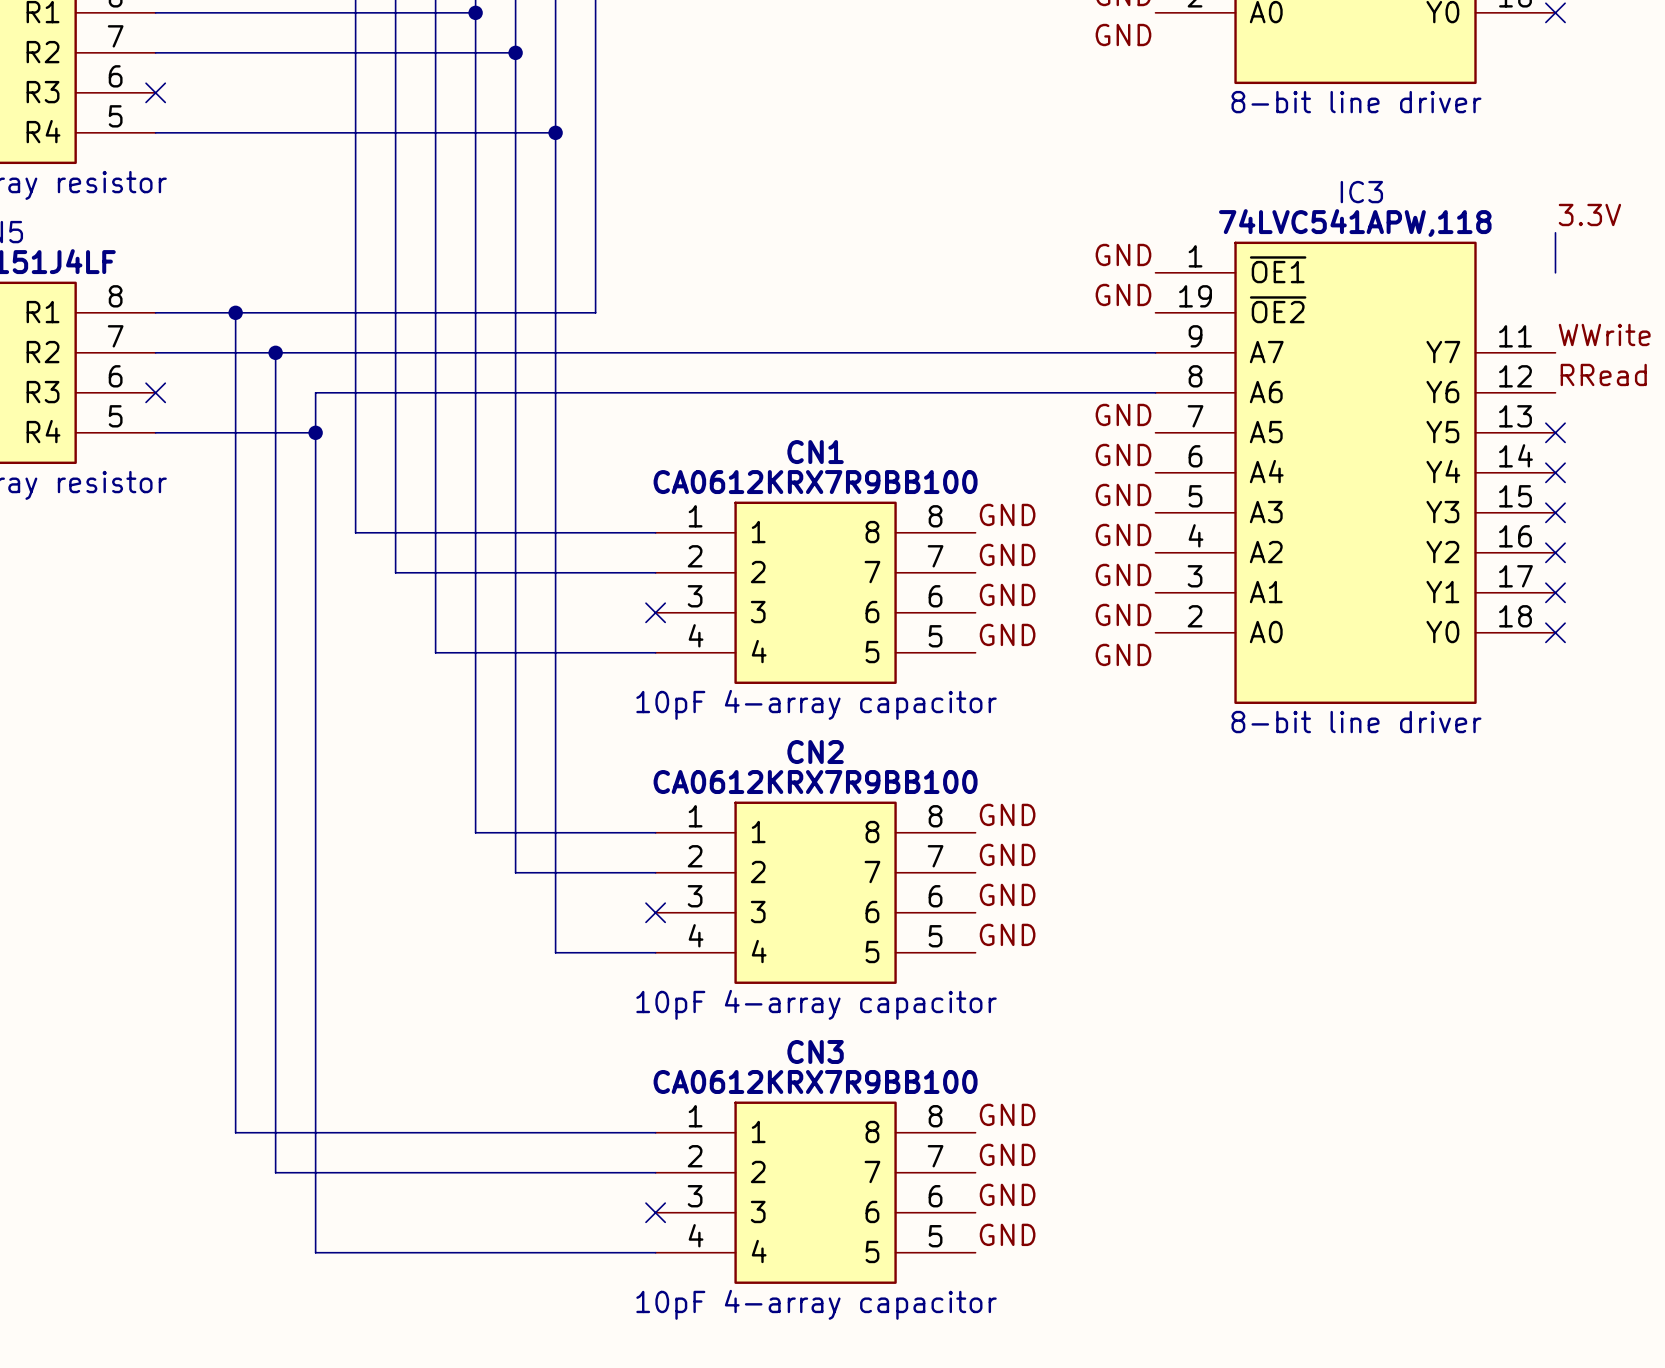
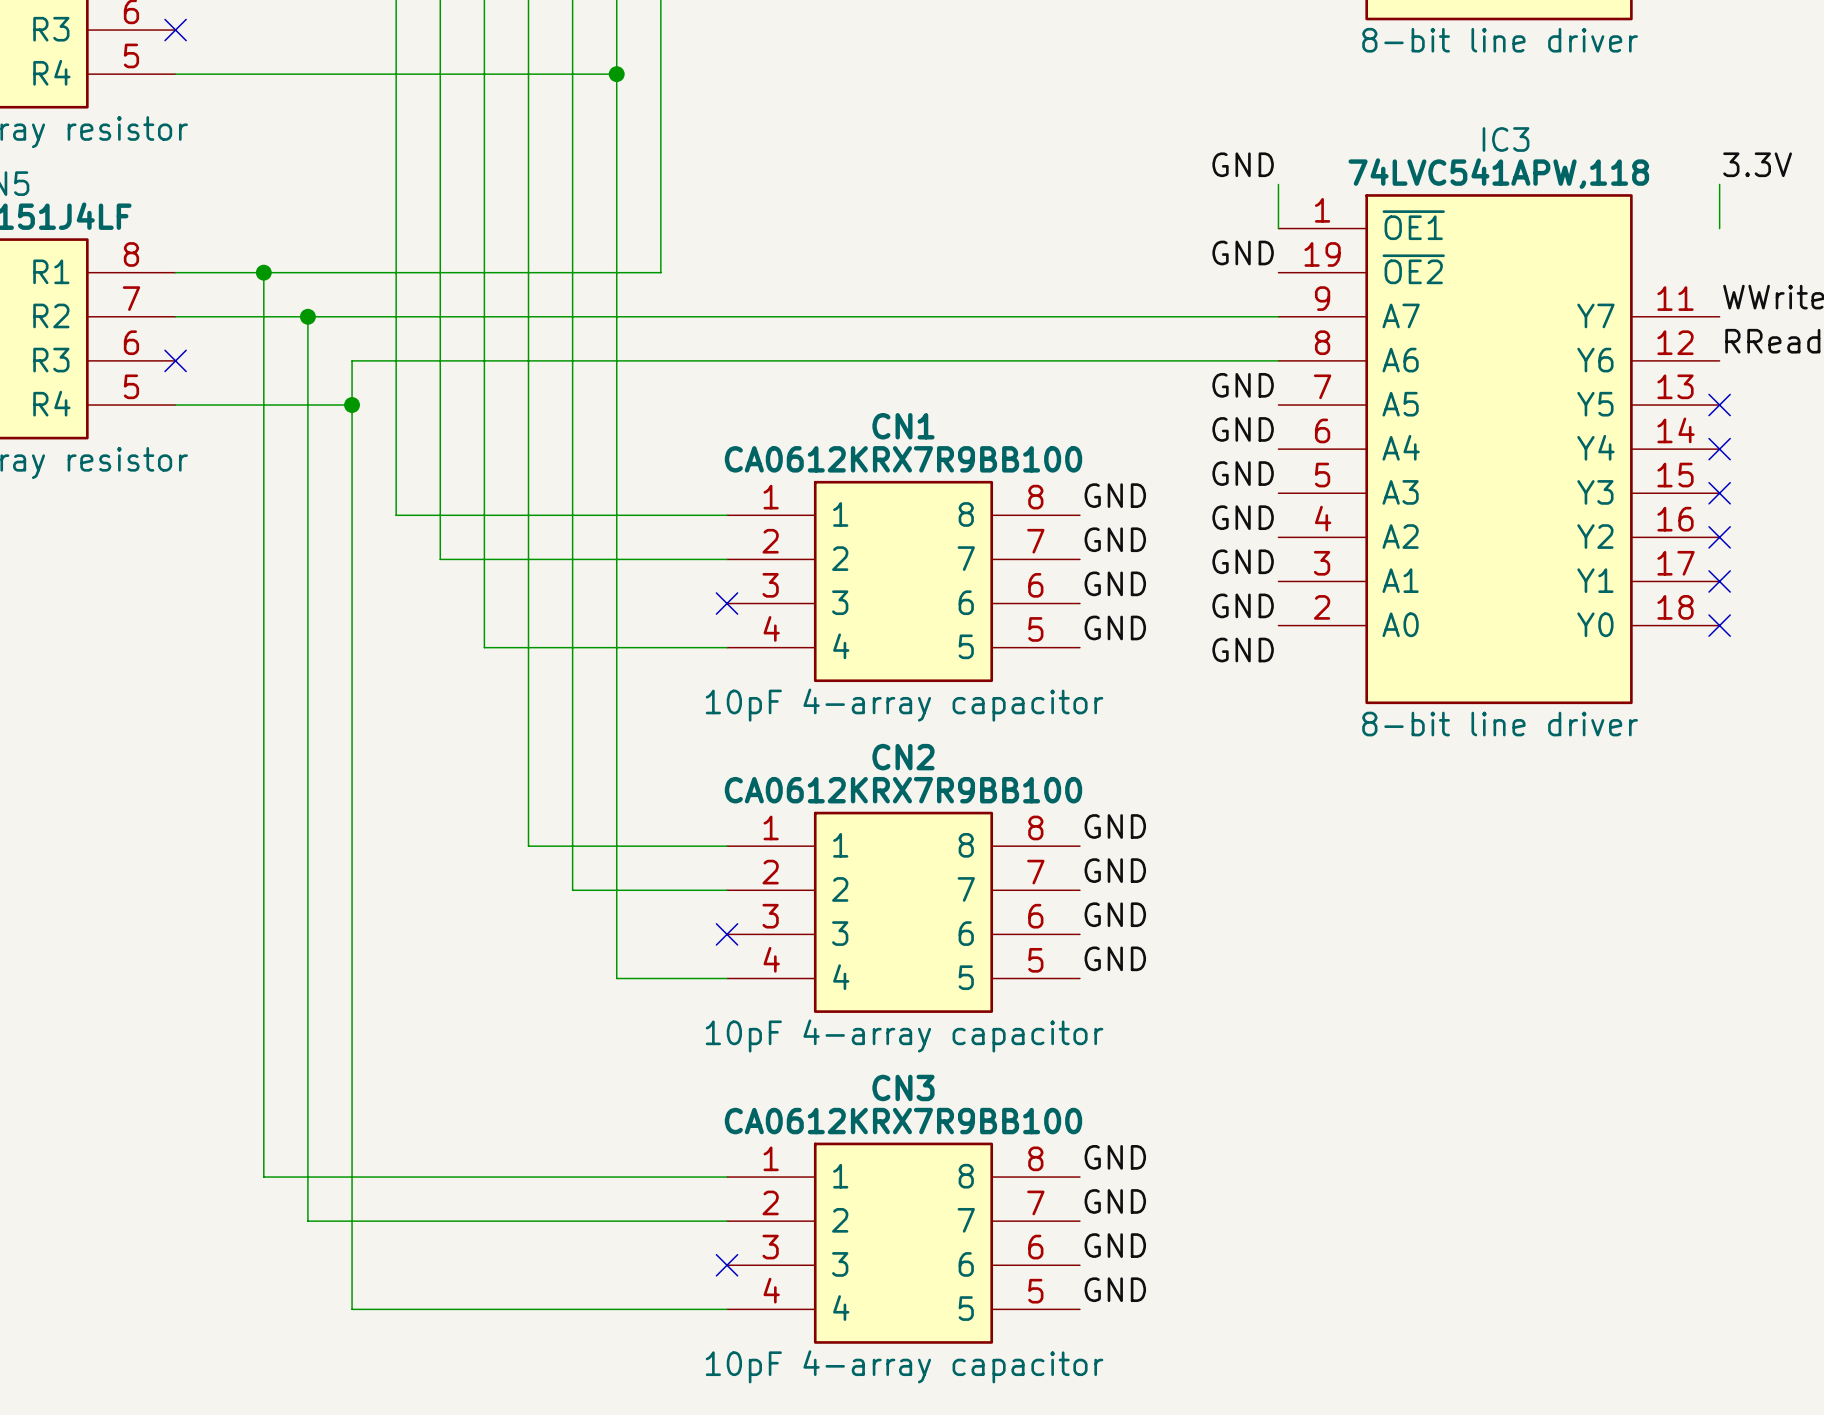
wire: none -> (1278, 184) (1278, 228)
label position: GND (1123, 254) -> GND (1243, 164)

